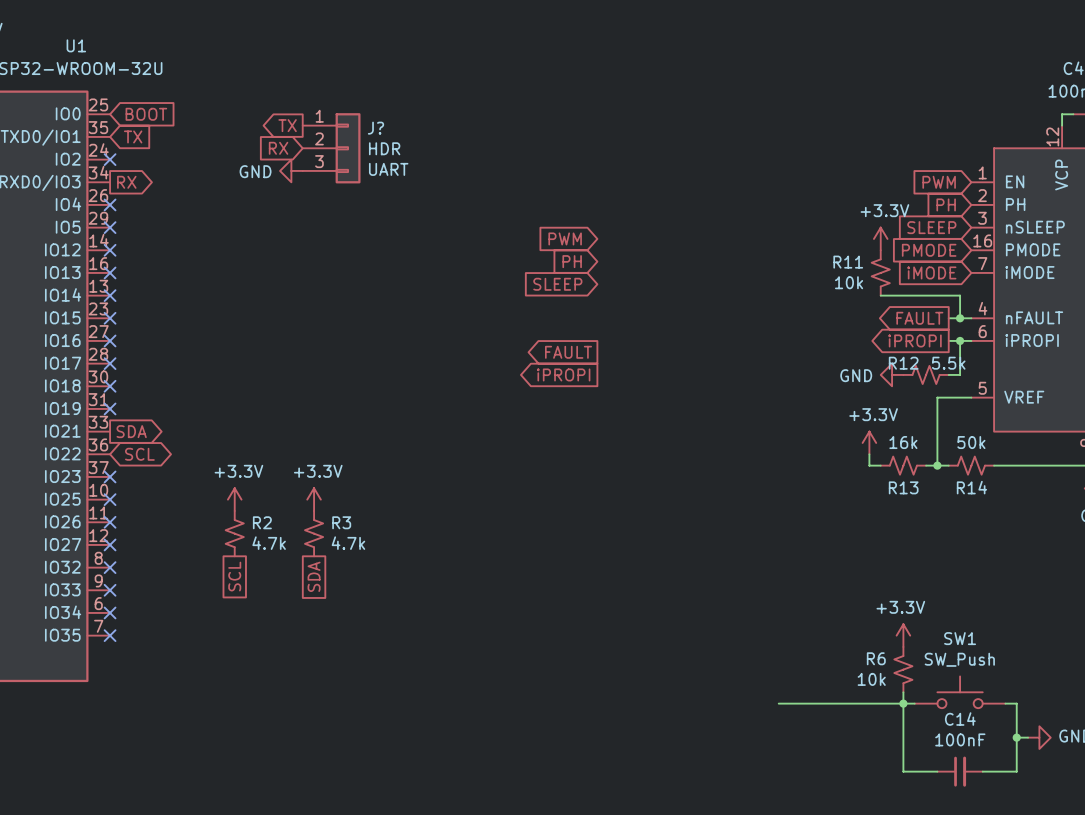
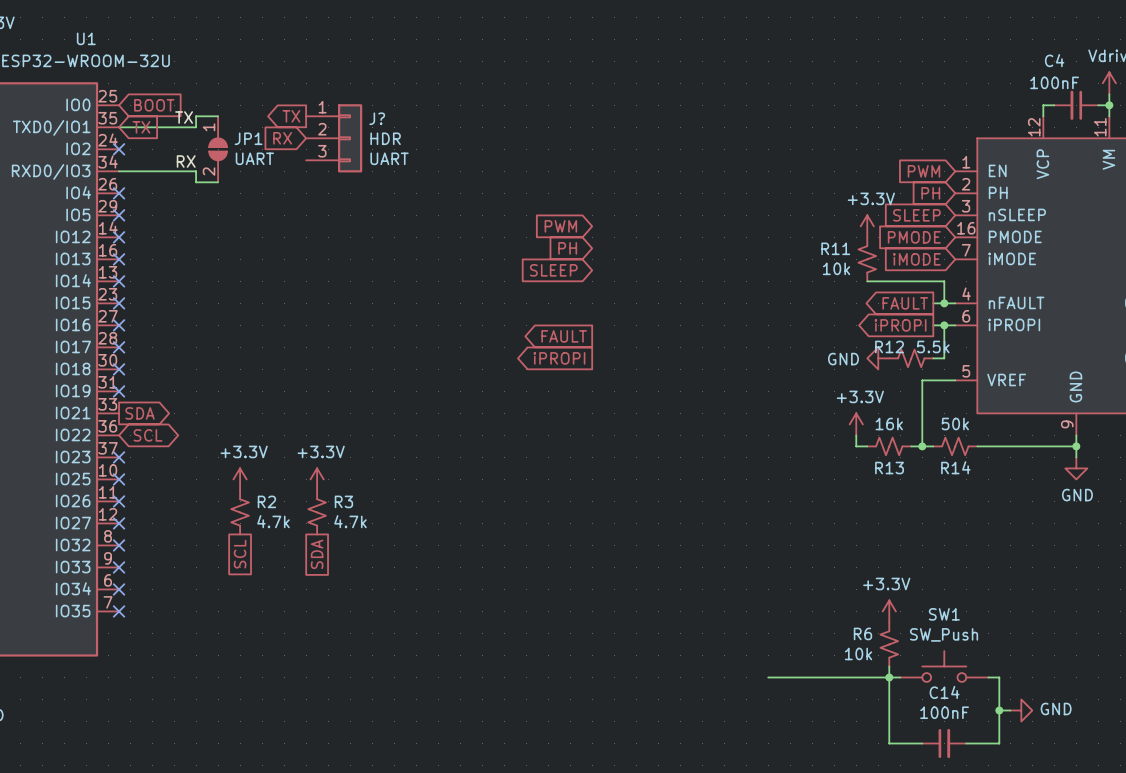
wire: none -> (218, 116) (196, 116) (196, 127) (119, 127)
label: none -> TX (184, 117)
JP1: none -> UART (218, 149)
power symbol: GND (291, 170) -> none
label: none -> RX (186, 161)
wire: none -> (119, 171) (196, 171) (196, 182) (218, 182)
global label: RX (126, 182) -> none

